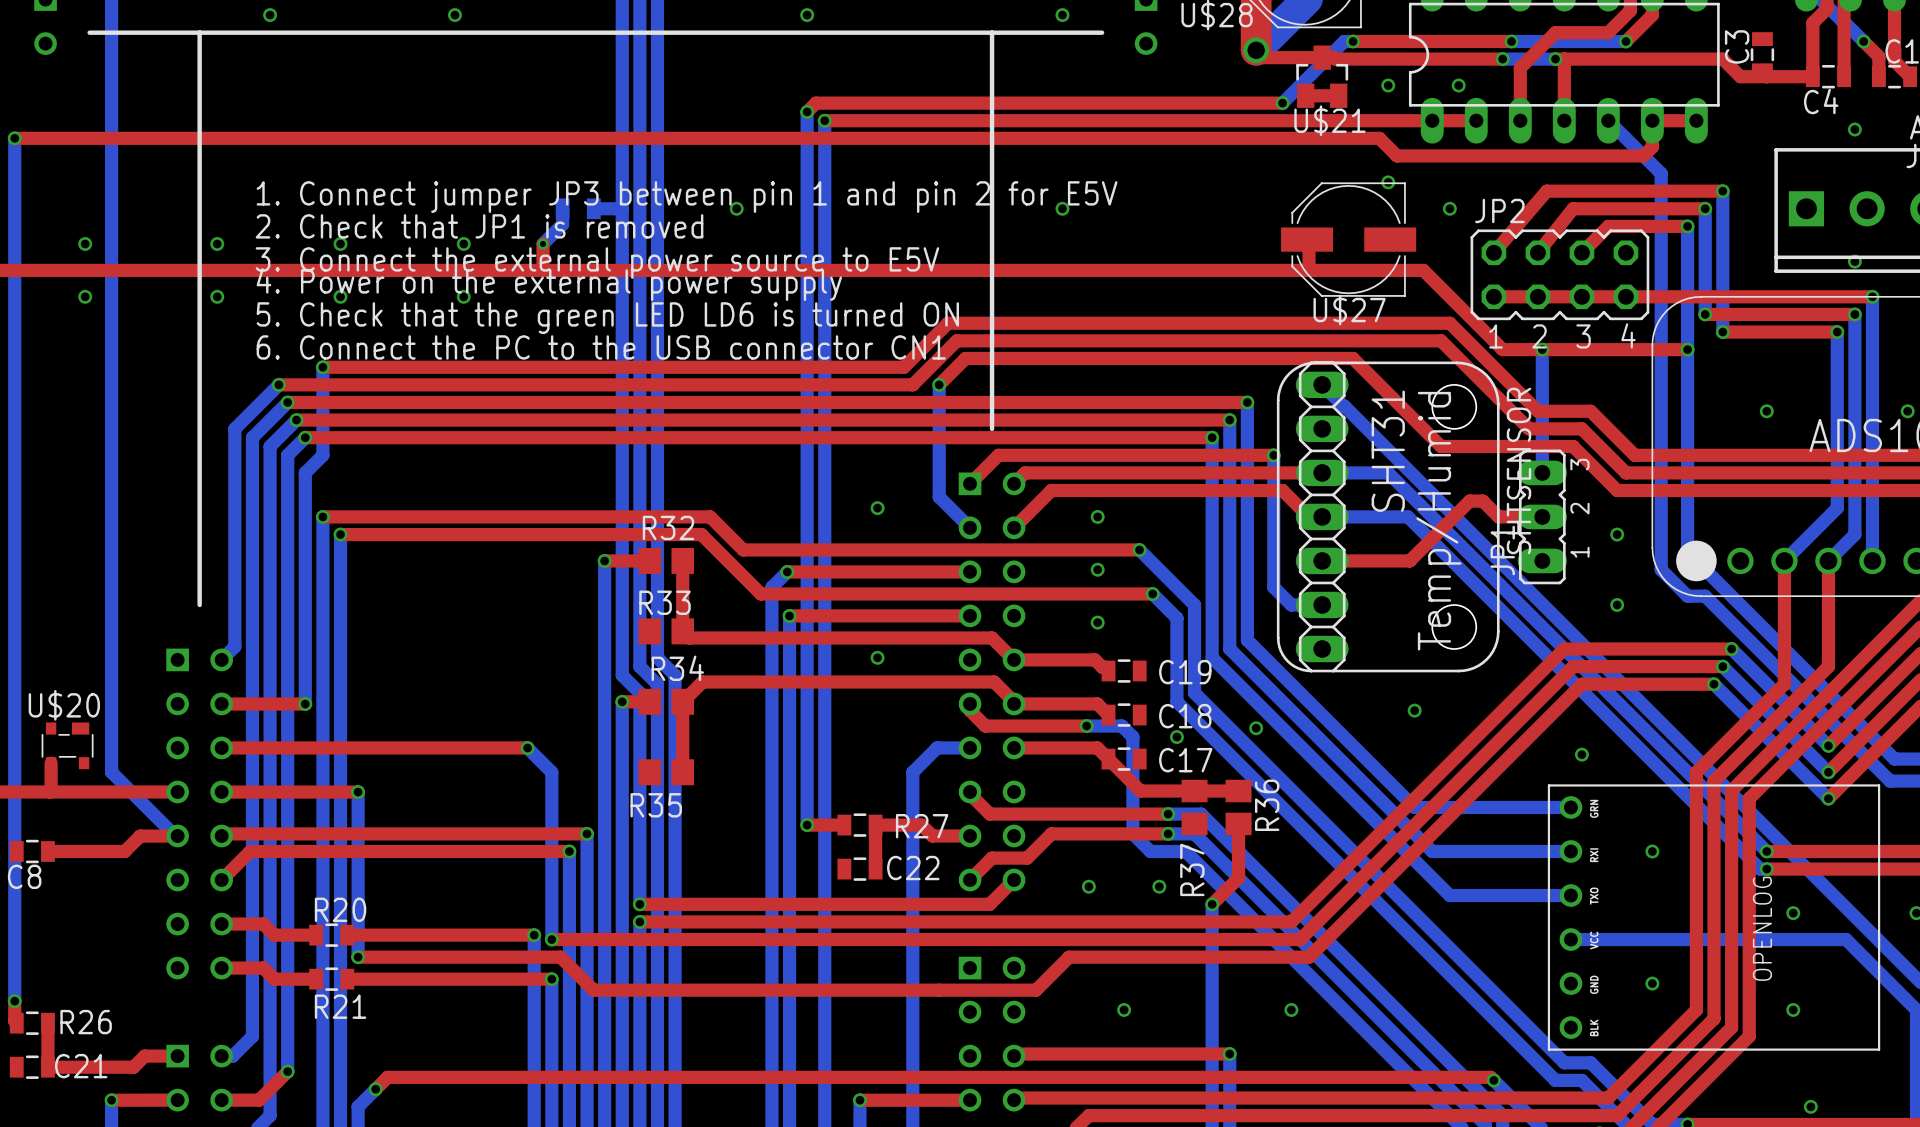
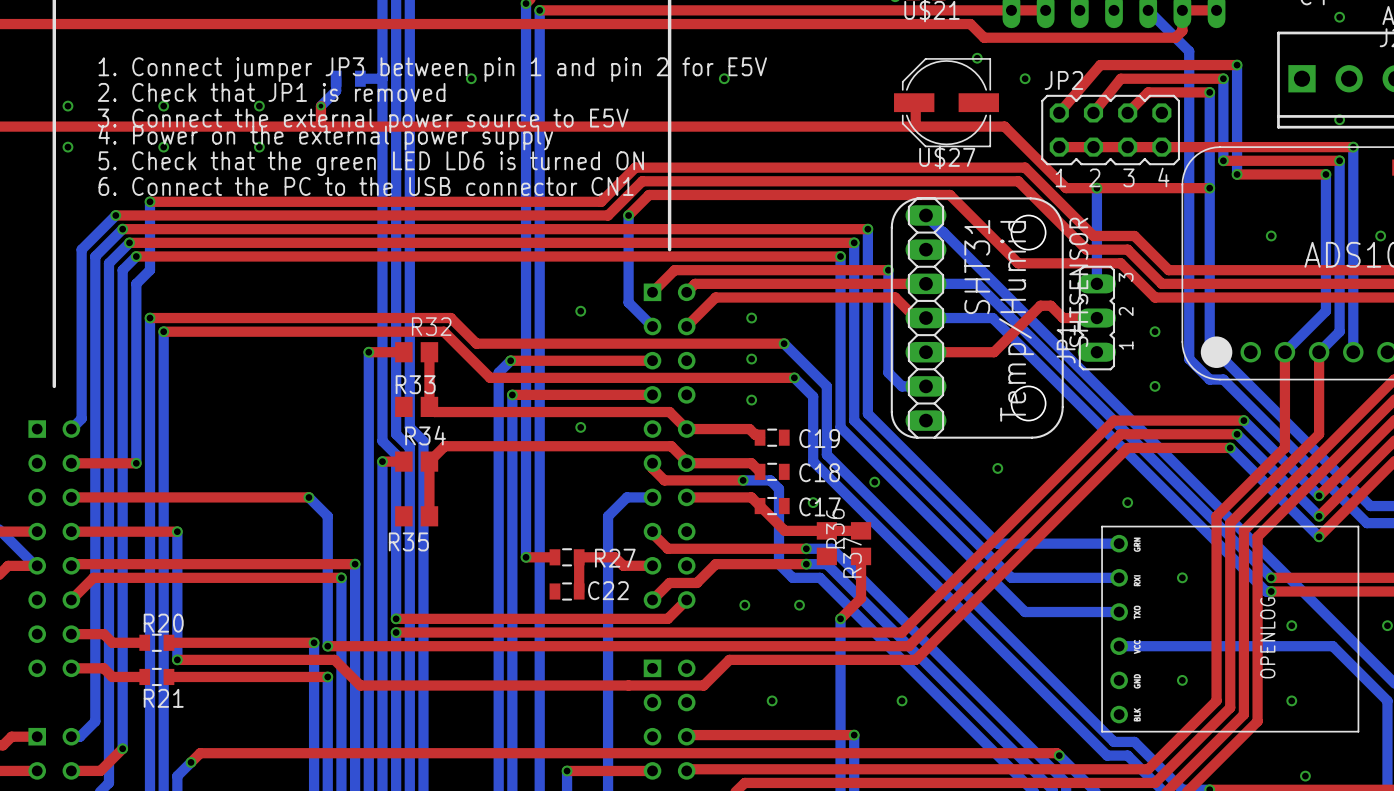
R32 name position: R32 (668, 527) -> R32 (431, 326)
via position: (1176, 737) -> (813, 502)
R36 name position: R36 (1267, 805) -> R36 (835, 528)
R37 name position: R37 (1192, 869) -> R37 (852, 557)

